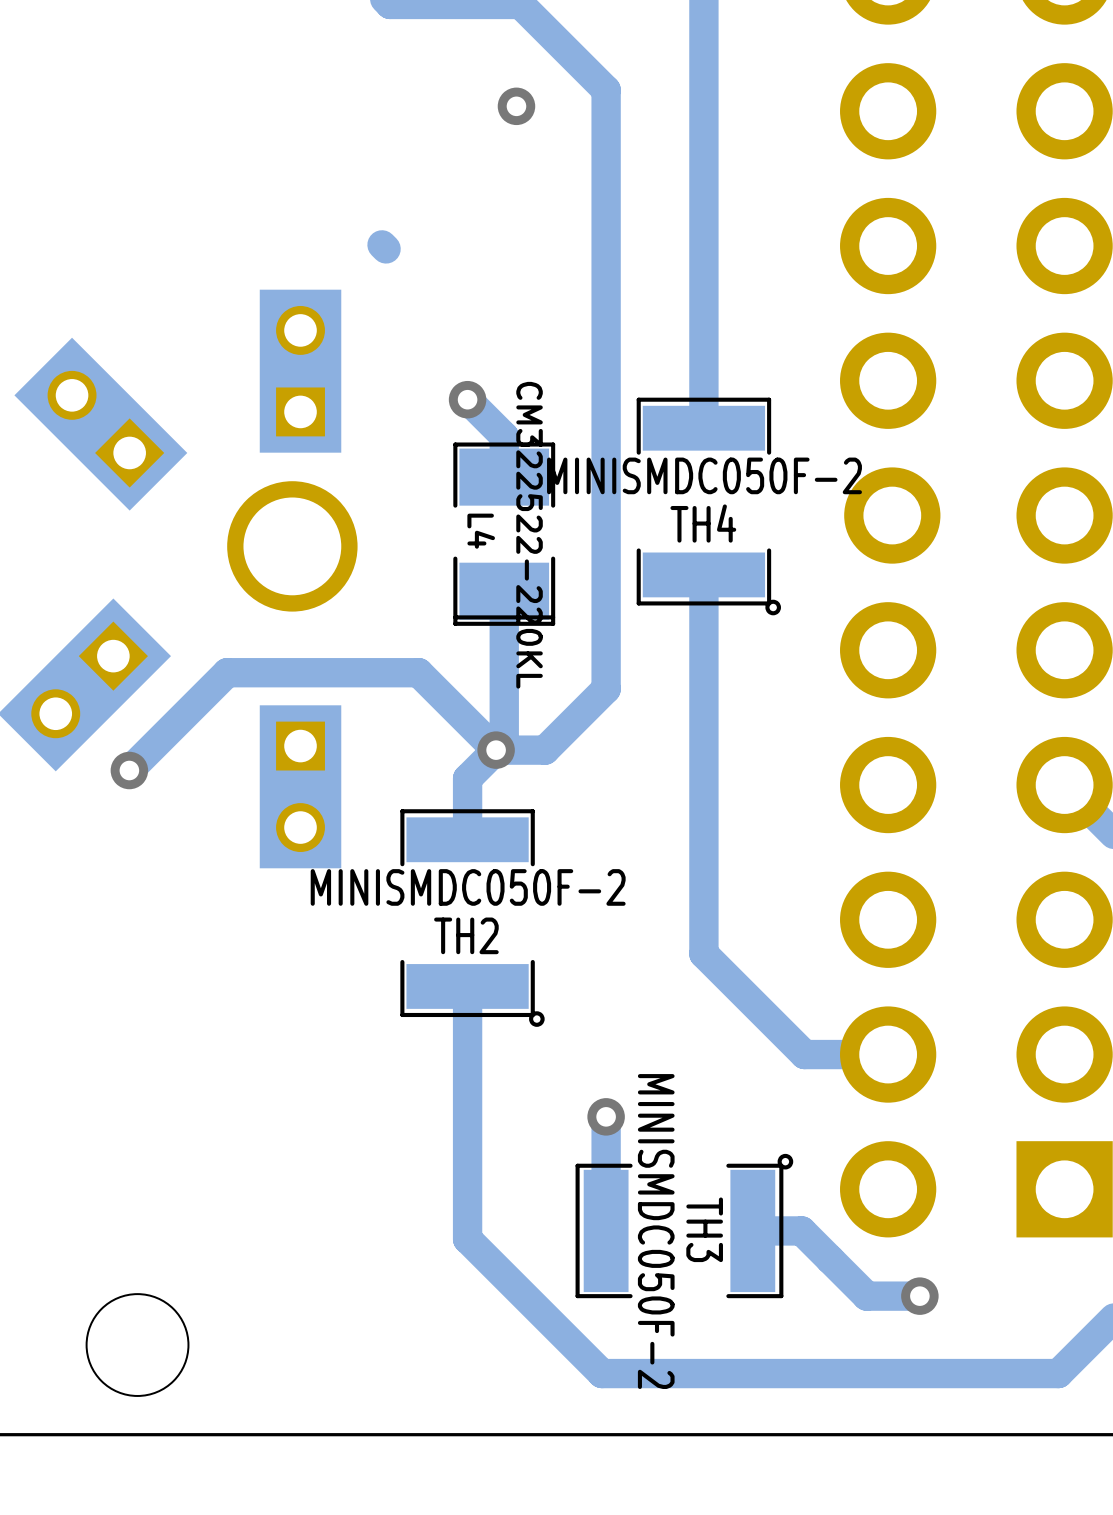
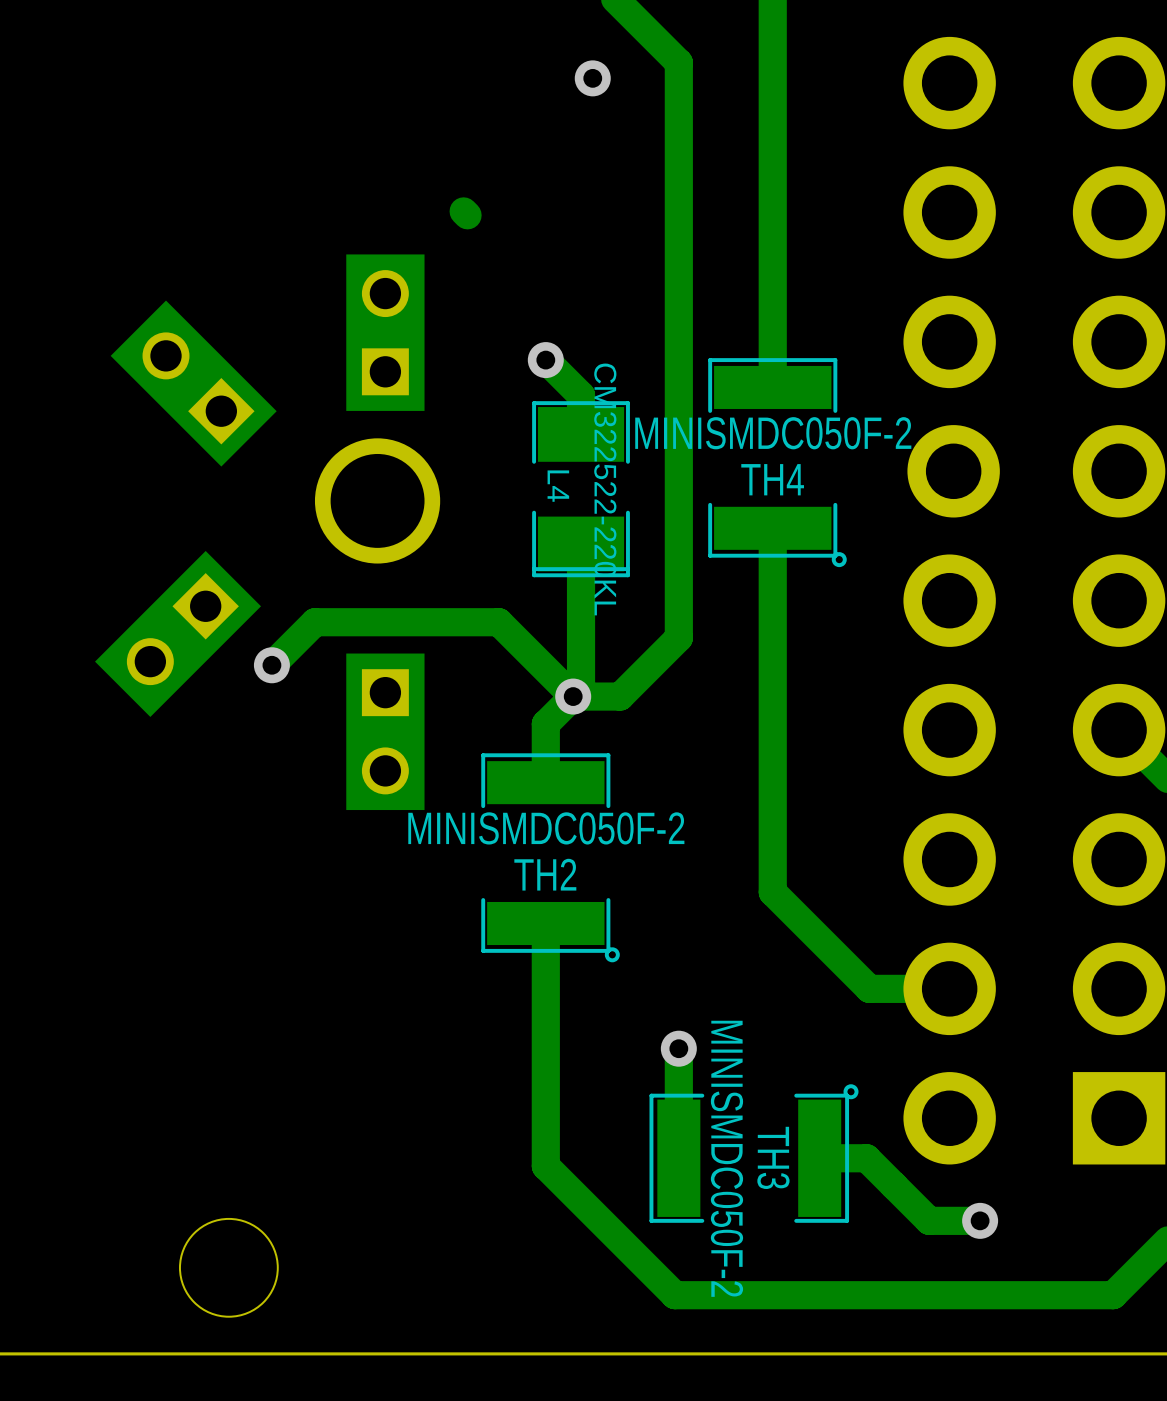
track: (182, 717) (129, 770) -> none
via position: (129, 770) -> (271, 665)

